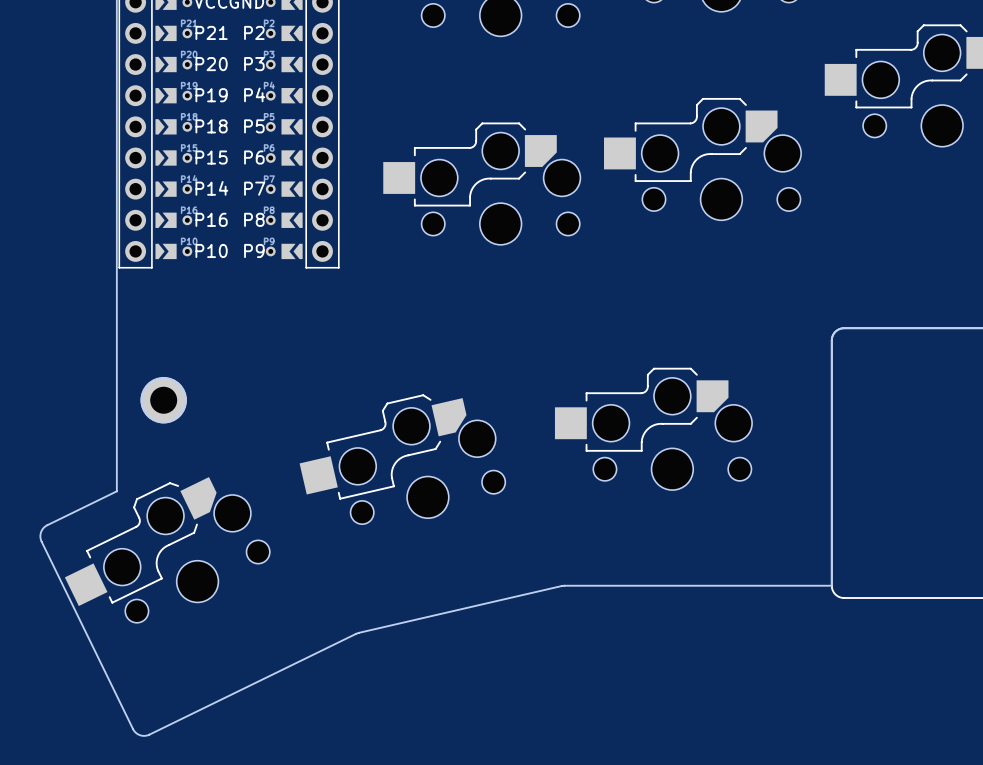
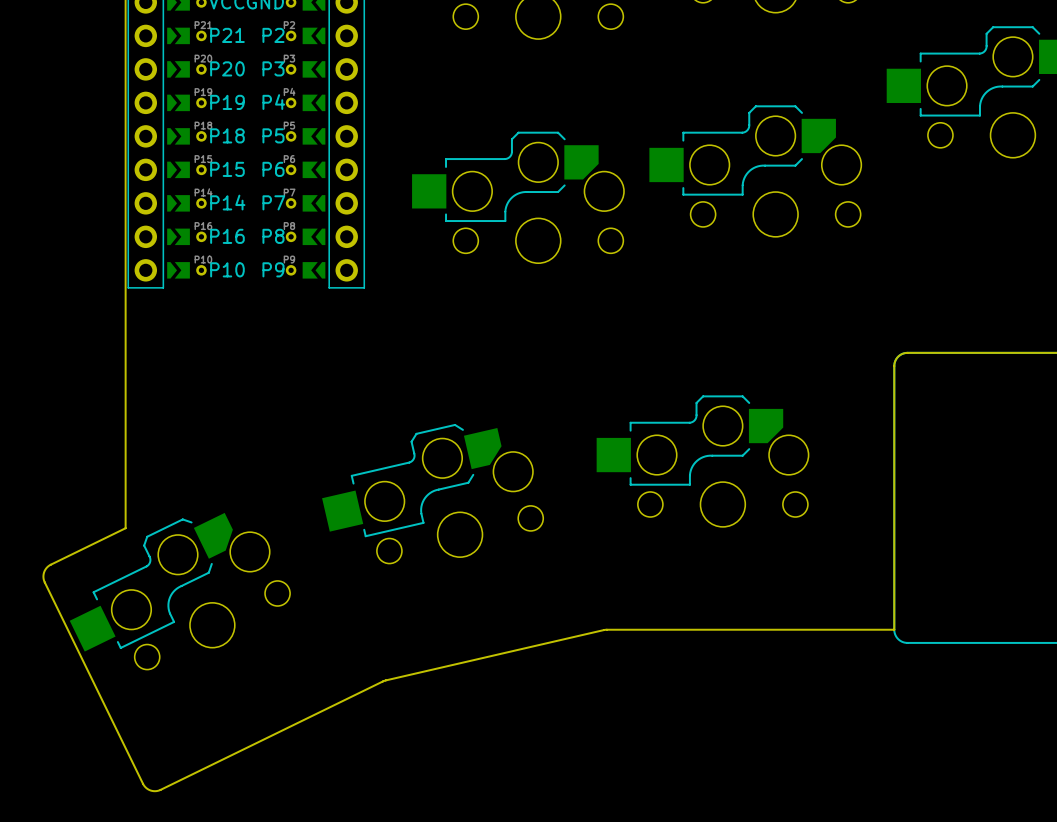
part: (163, 400) -> none

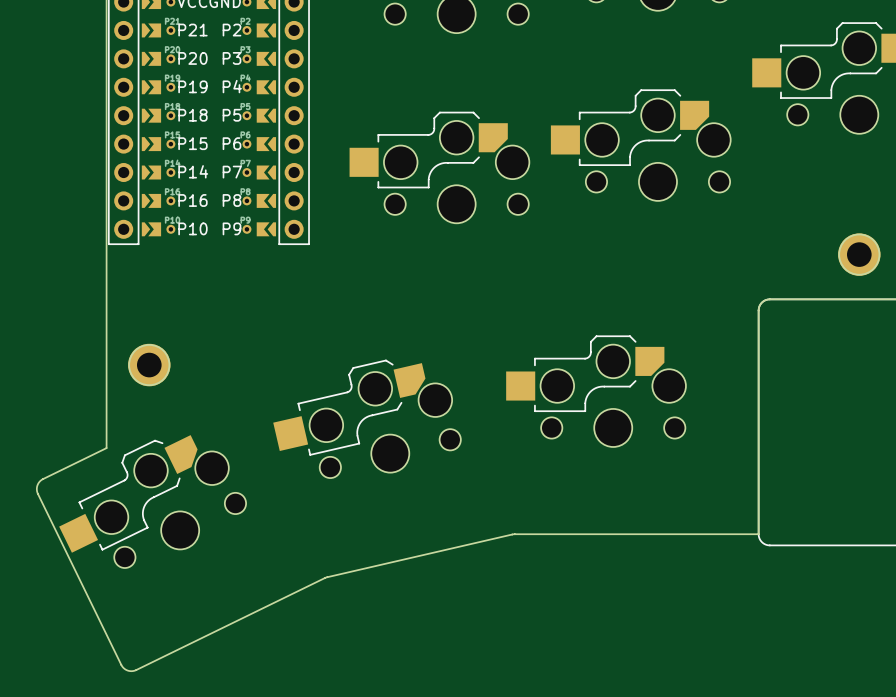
round board edge: none -> [838, 233, 881, 276]
part: none -> (859, 254)
round board edge: none -> [128, 344, 171, 387]
part: none -> (149, 365)

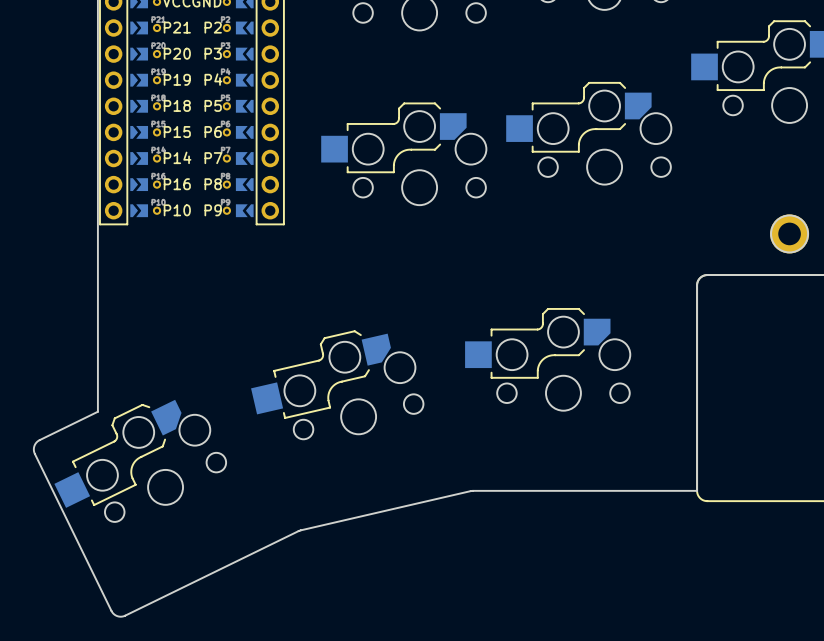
round board edge: [128, 344, 171, 387] -> none
part: (149, 365) -> none

